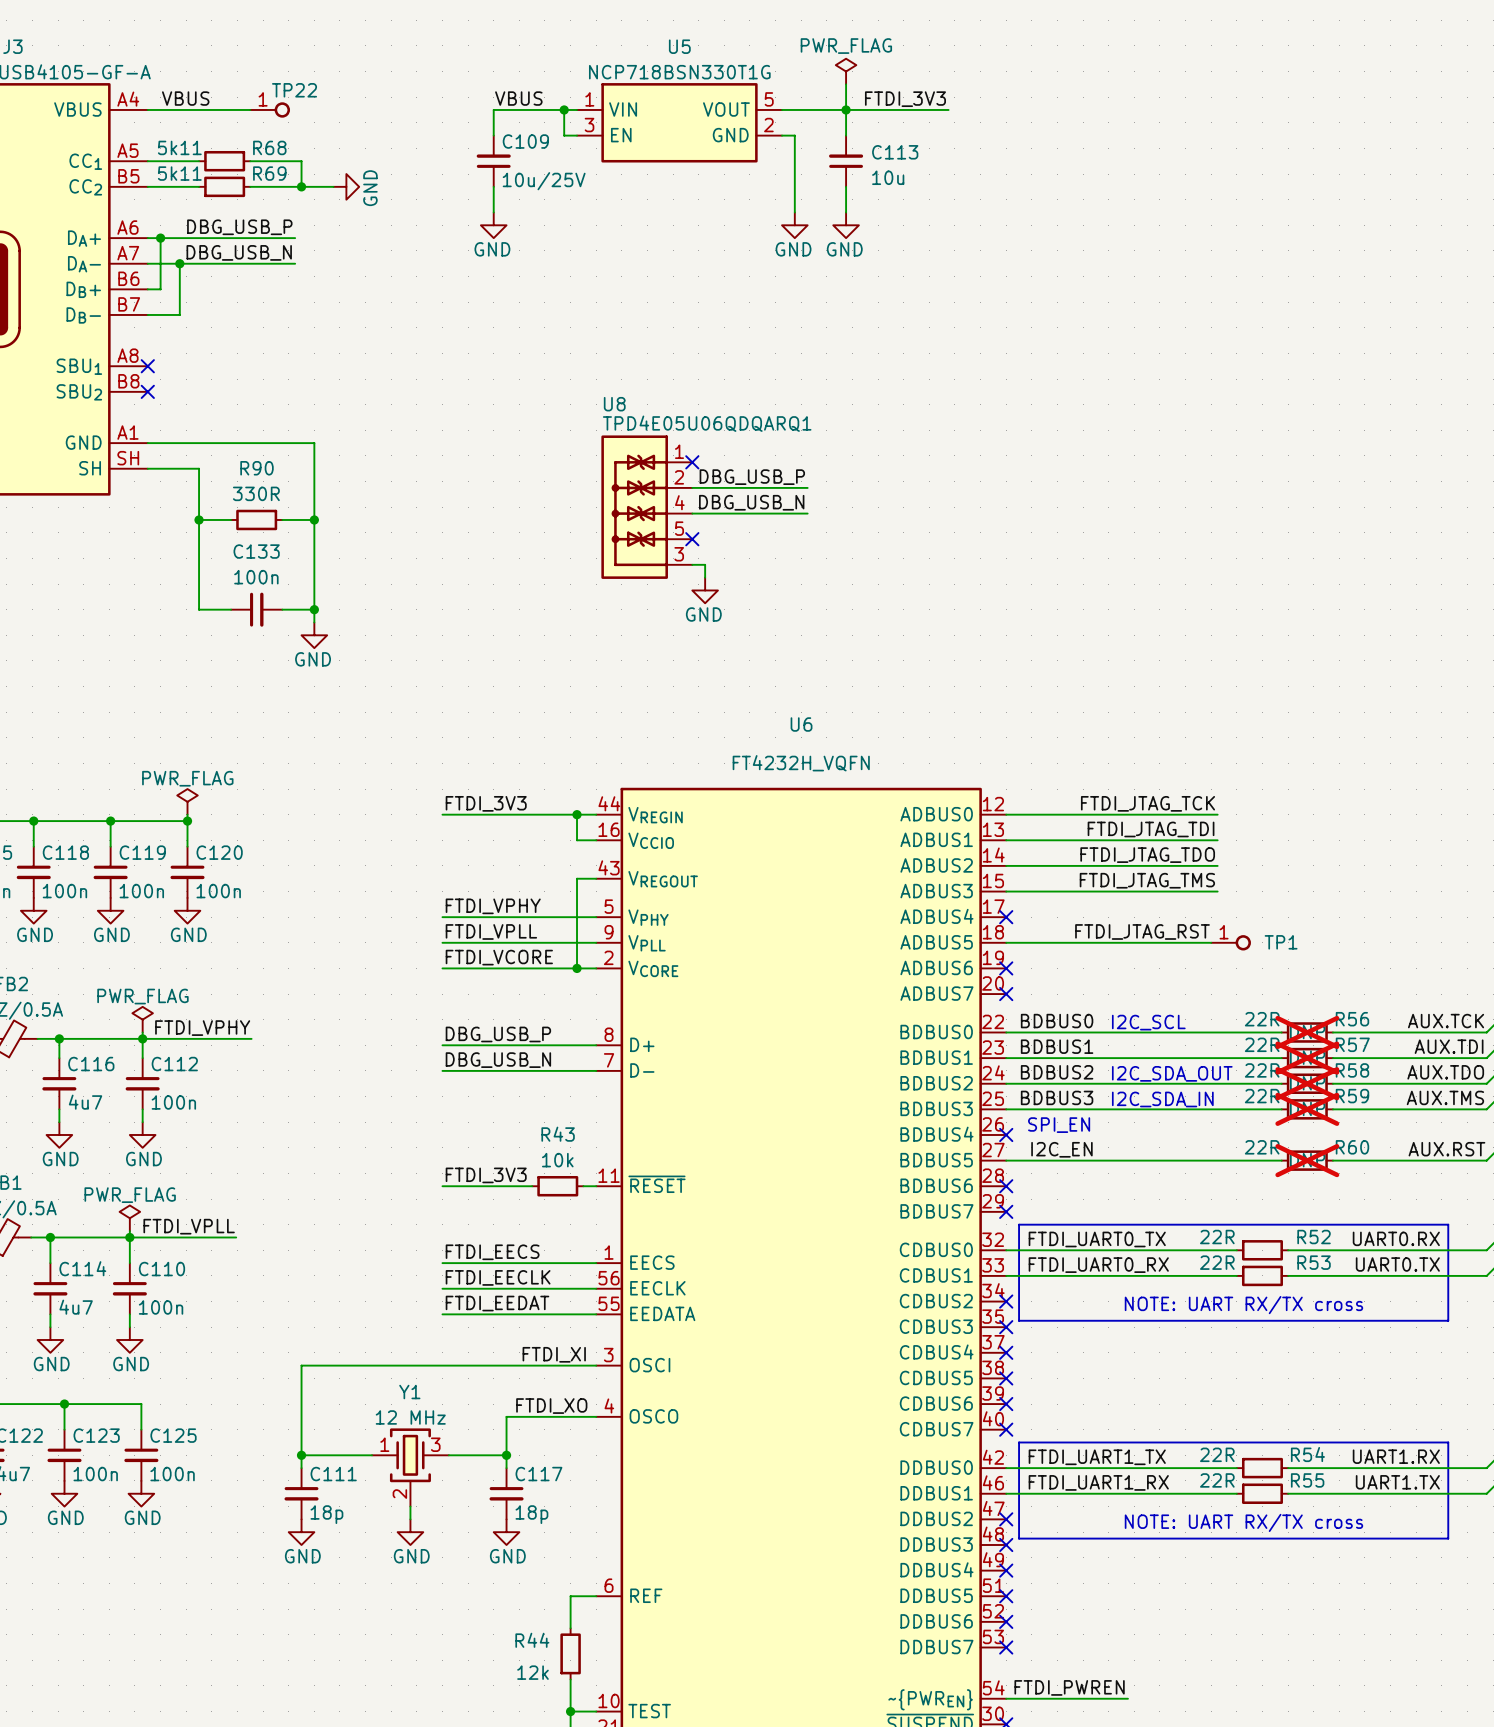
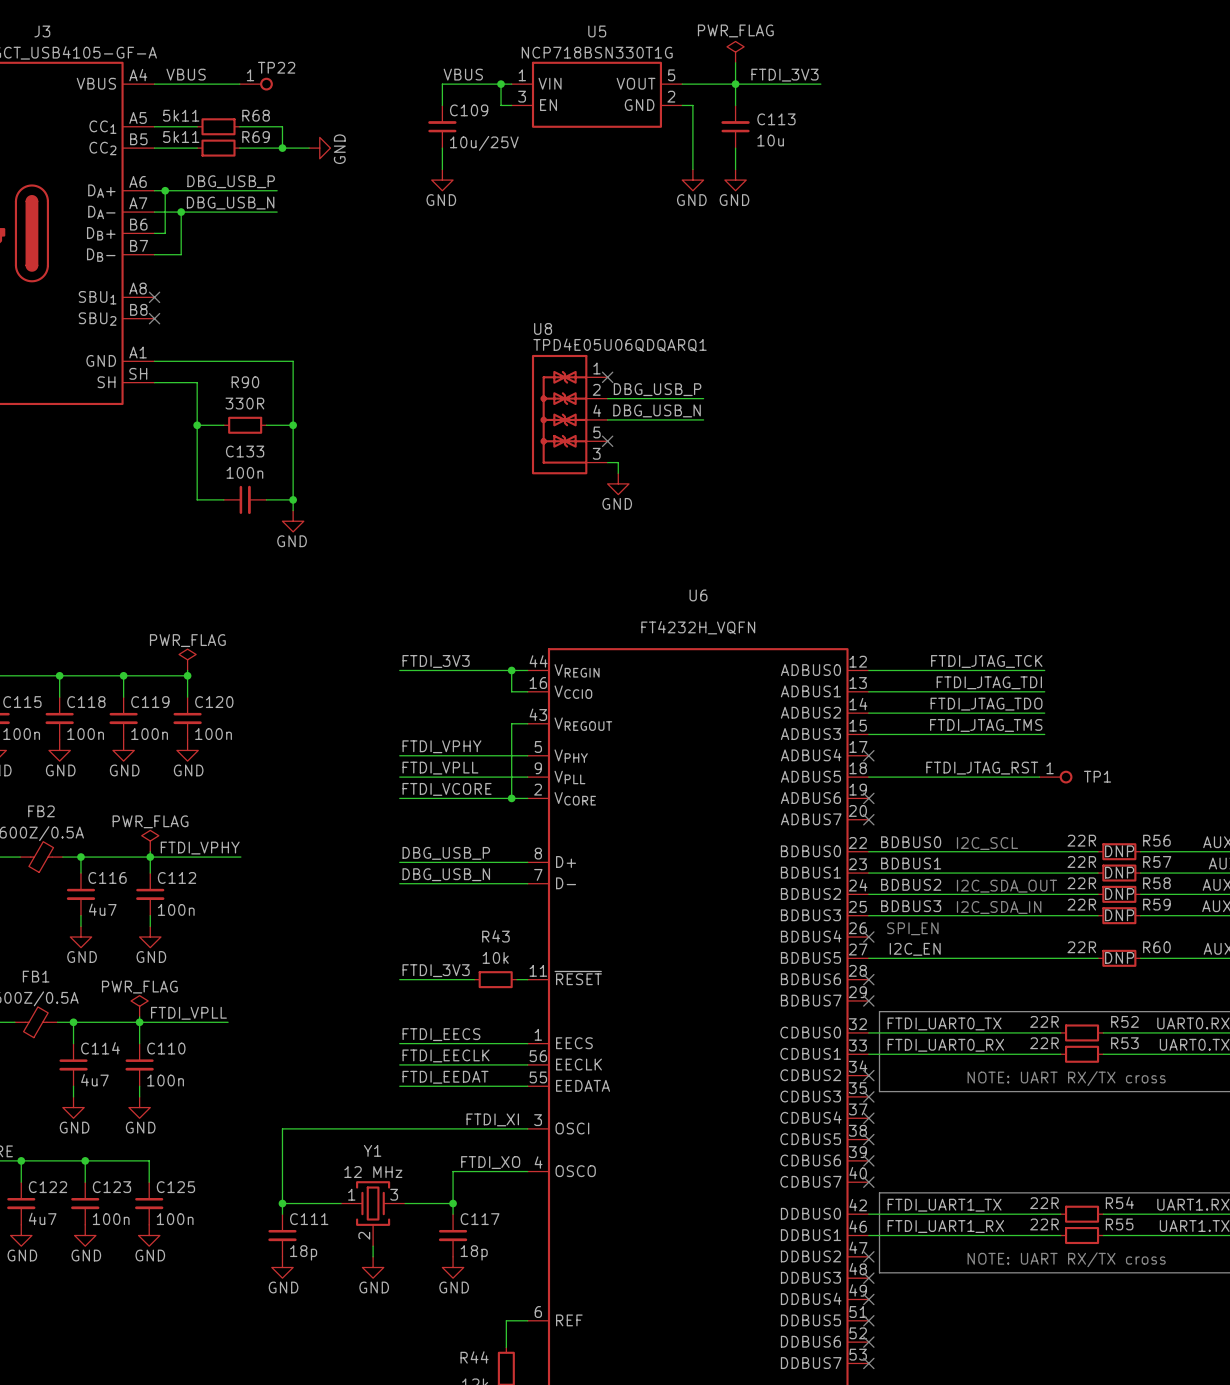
R56 do-not-place cross: (1307, 1032) -> none
R57 do-not-place cross: (1307, 1058) -> none
R58 do-not-place cross: (1307, 1083) -> none
R59 do-not-place cross: (1307, 1109) -> none
R60 do-not-place cross: (1307, 1160) -> none

